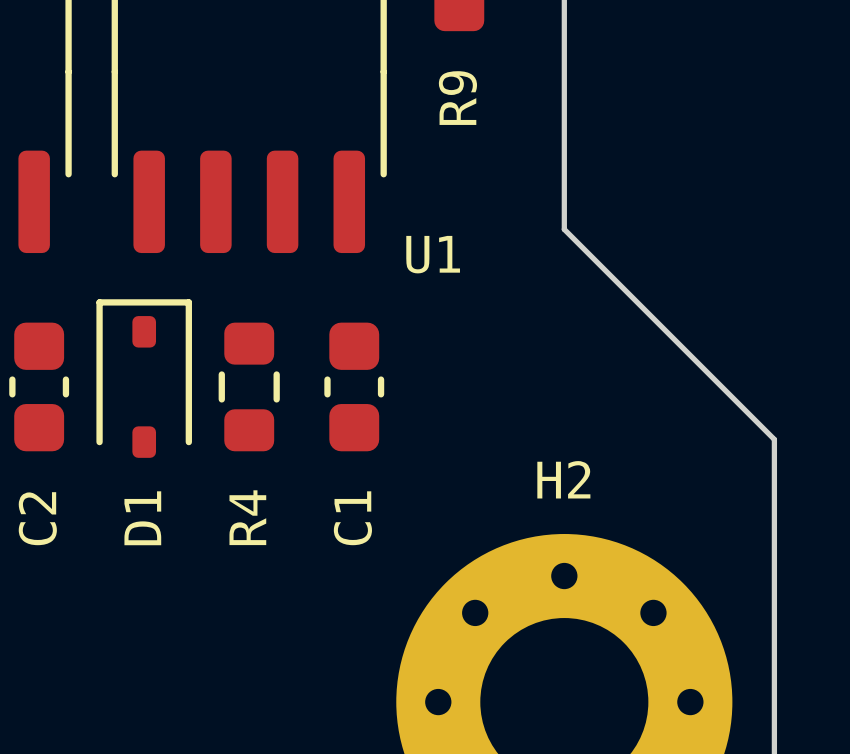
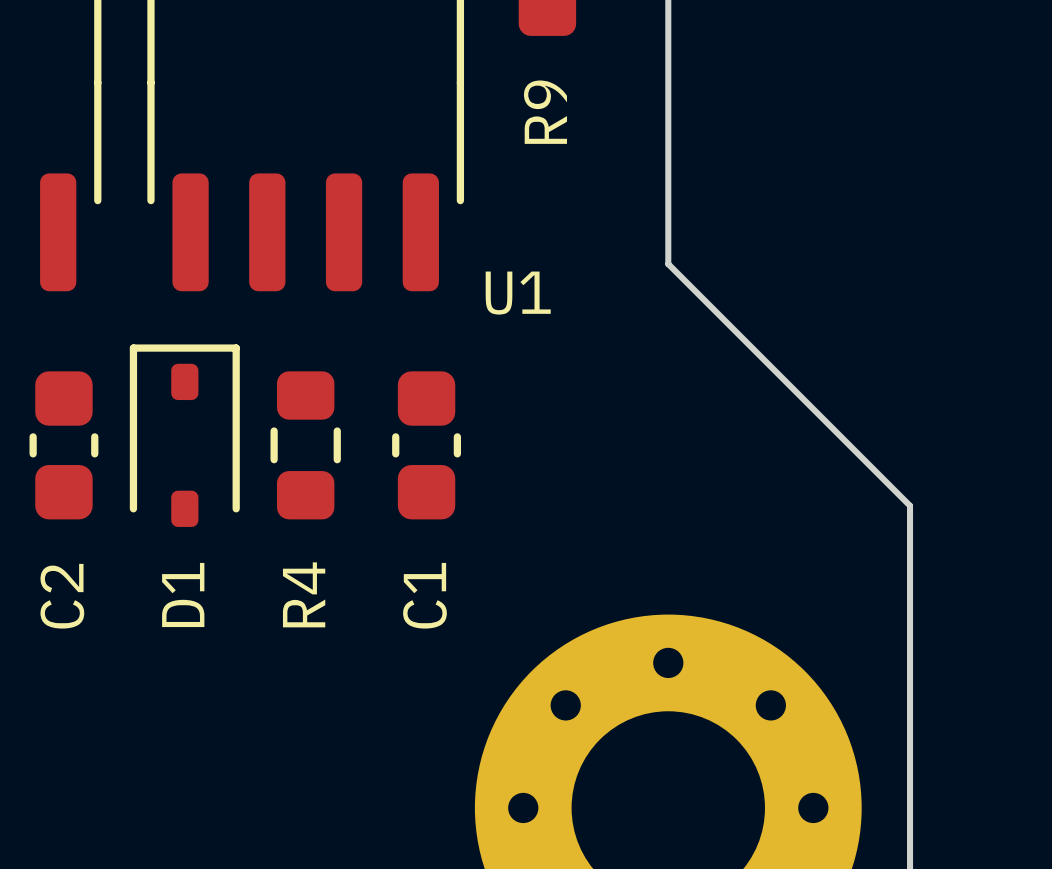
H2 name: H2 (563, 479) -> none

